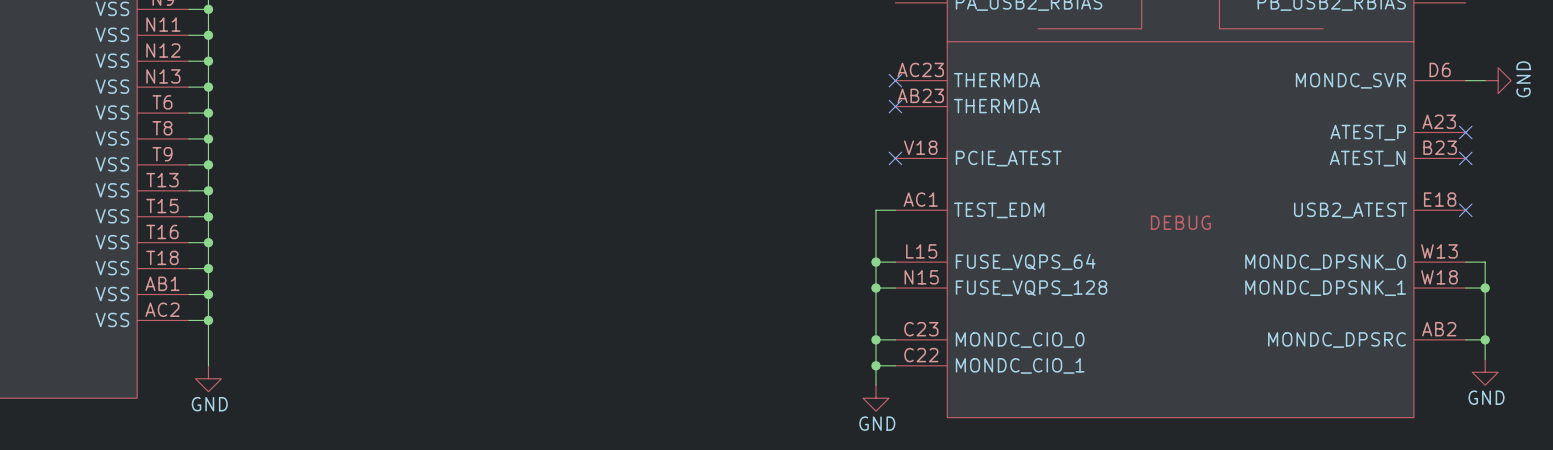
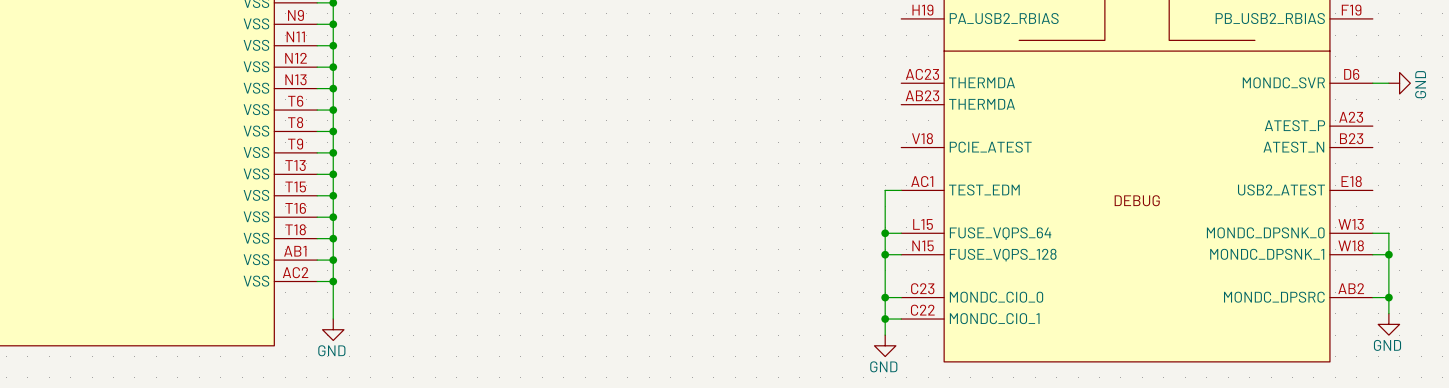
no-connect mark: (895, 80) -> none
no-connect mark: (895, 106) -> none
no-connect mark: (1465, 132) -> none
no-connect mark: (895, 158) -> none
no-connect mark: (1465, 158) -> none
no-connect mark: (1465, 210) -> none

